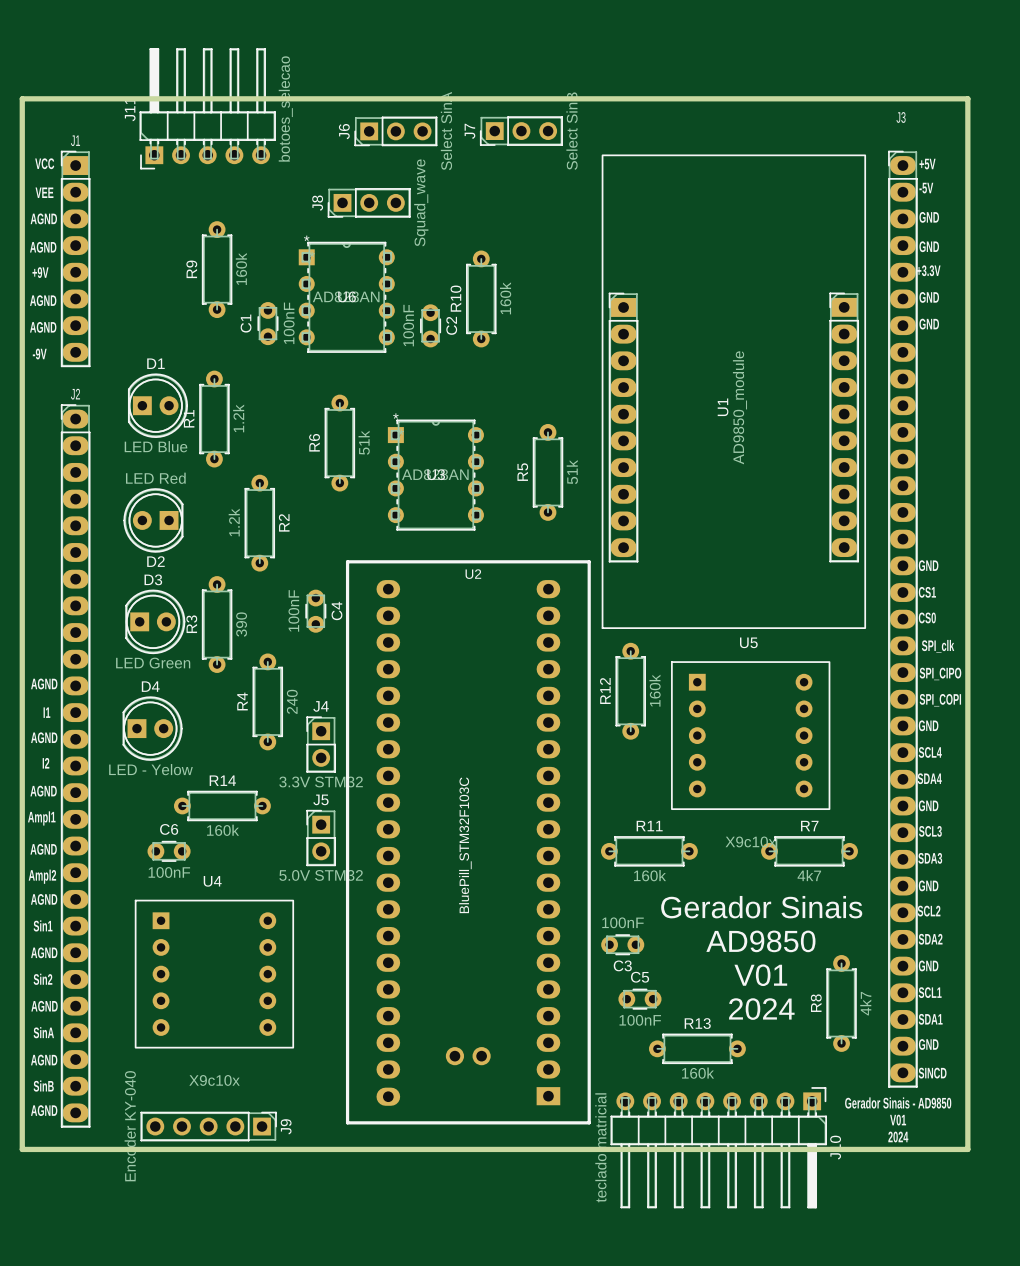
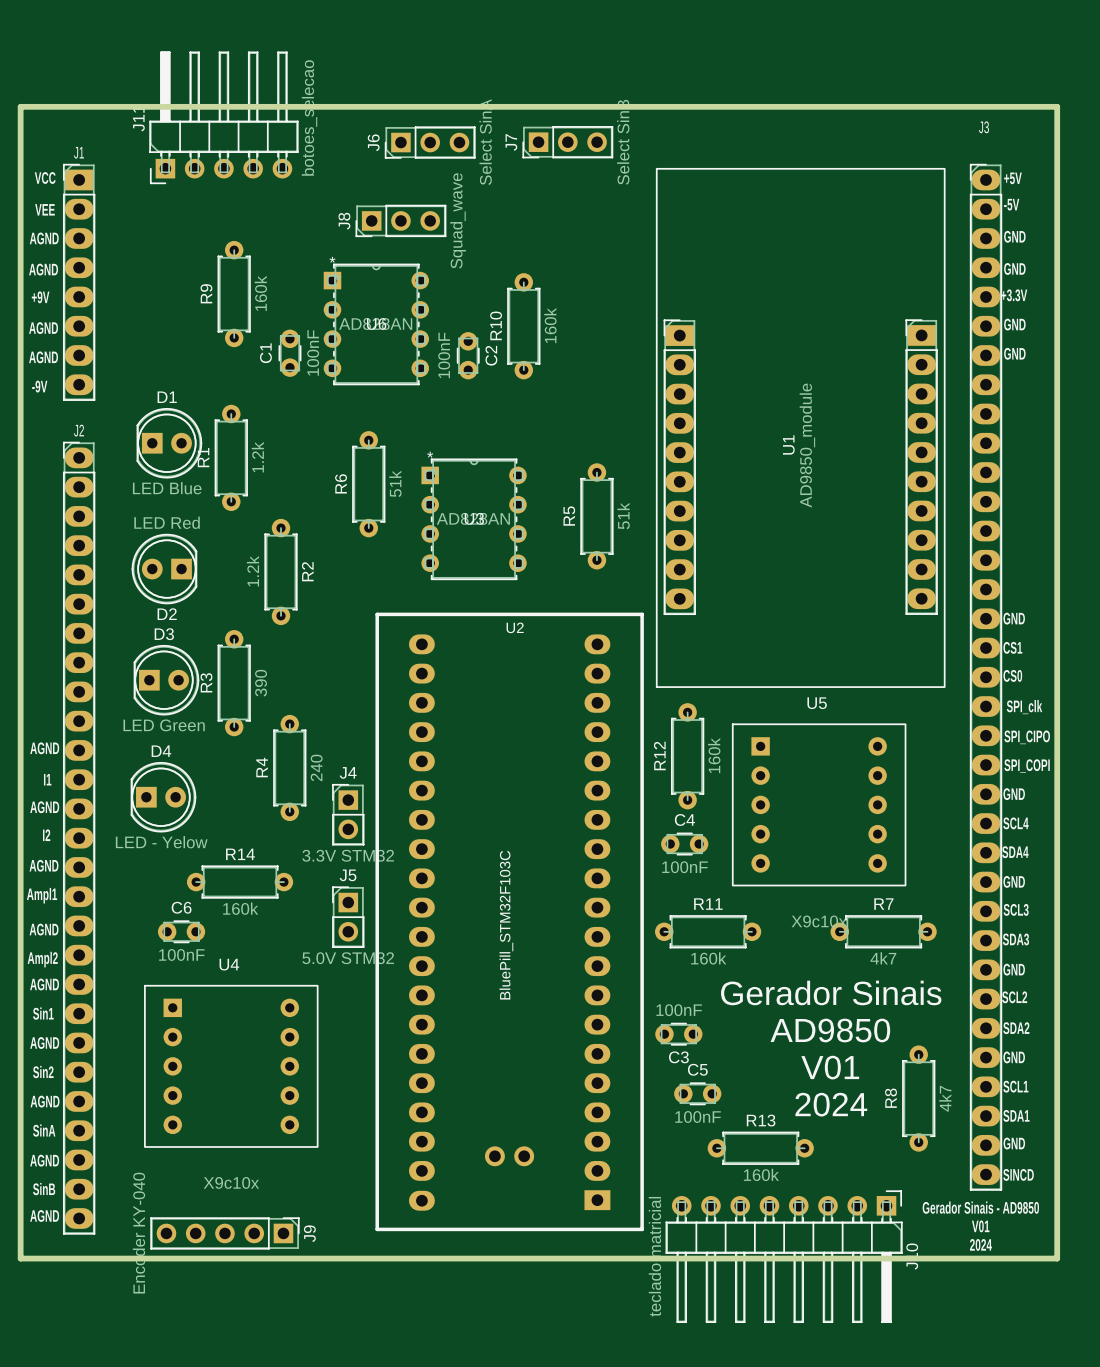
C4 value position: 100nF (293, 610) -> 100nF (685, 867)
C4 rotation: 0° (315, 611) -> 90° clockwise (684, 844)
C4 position: (315, 611) -> (684, 844)
C4 name position: C4 (336, 611) -> C4 (684, 819)

